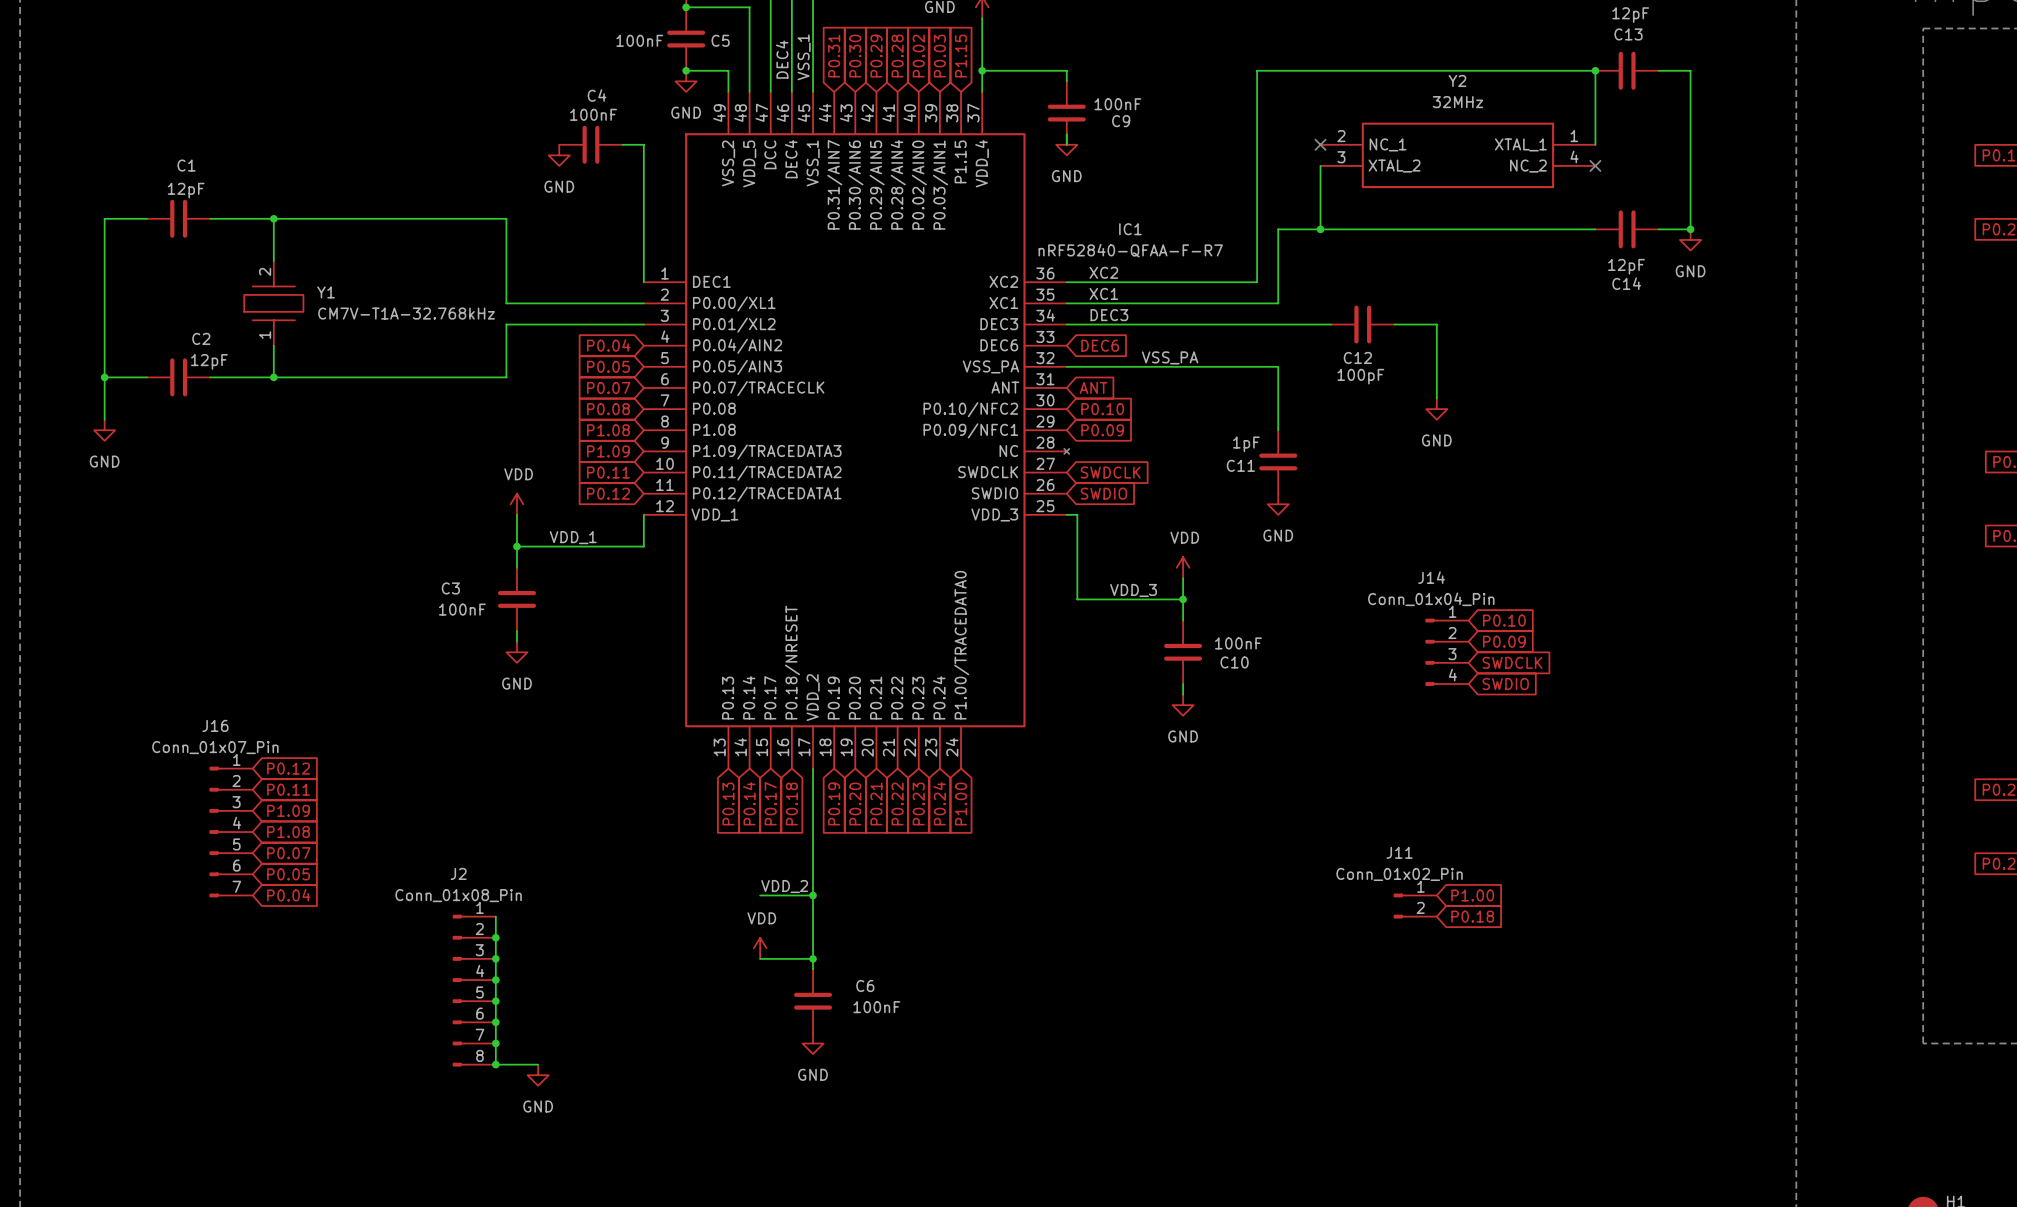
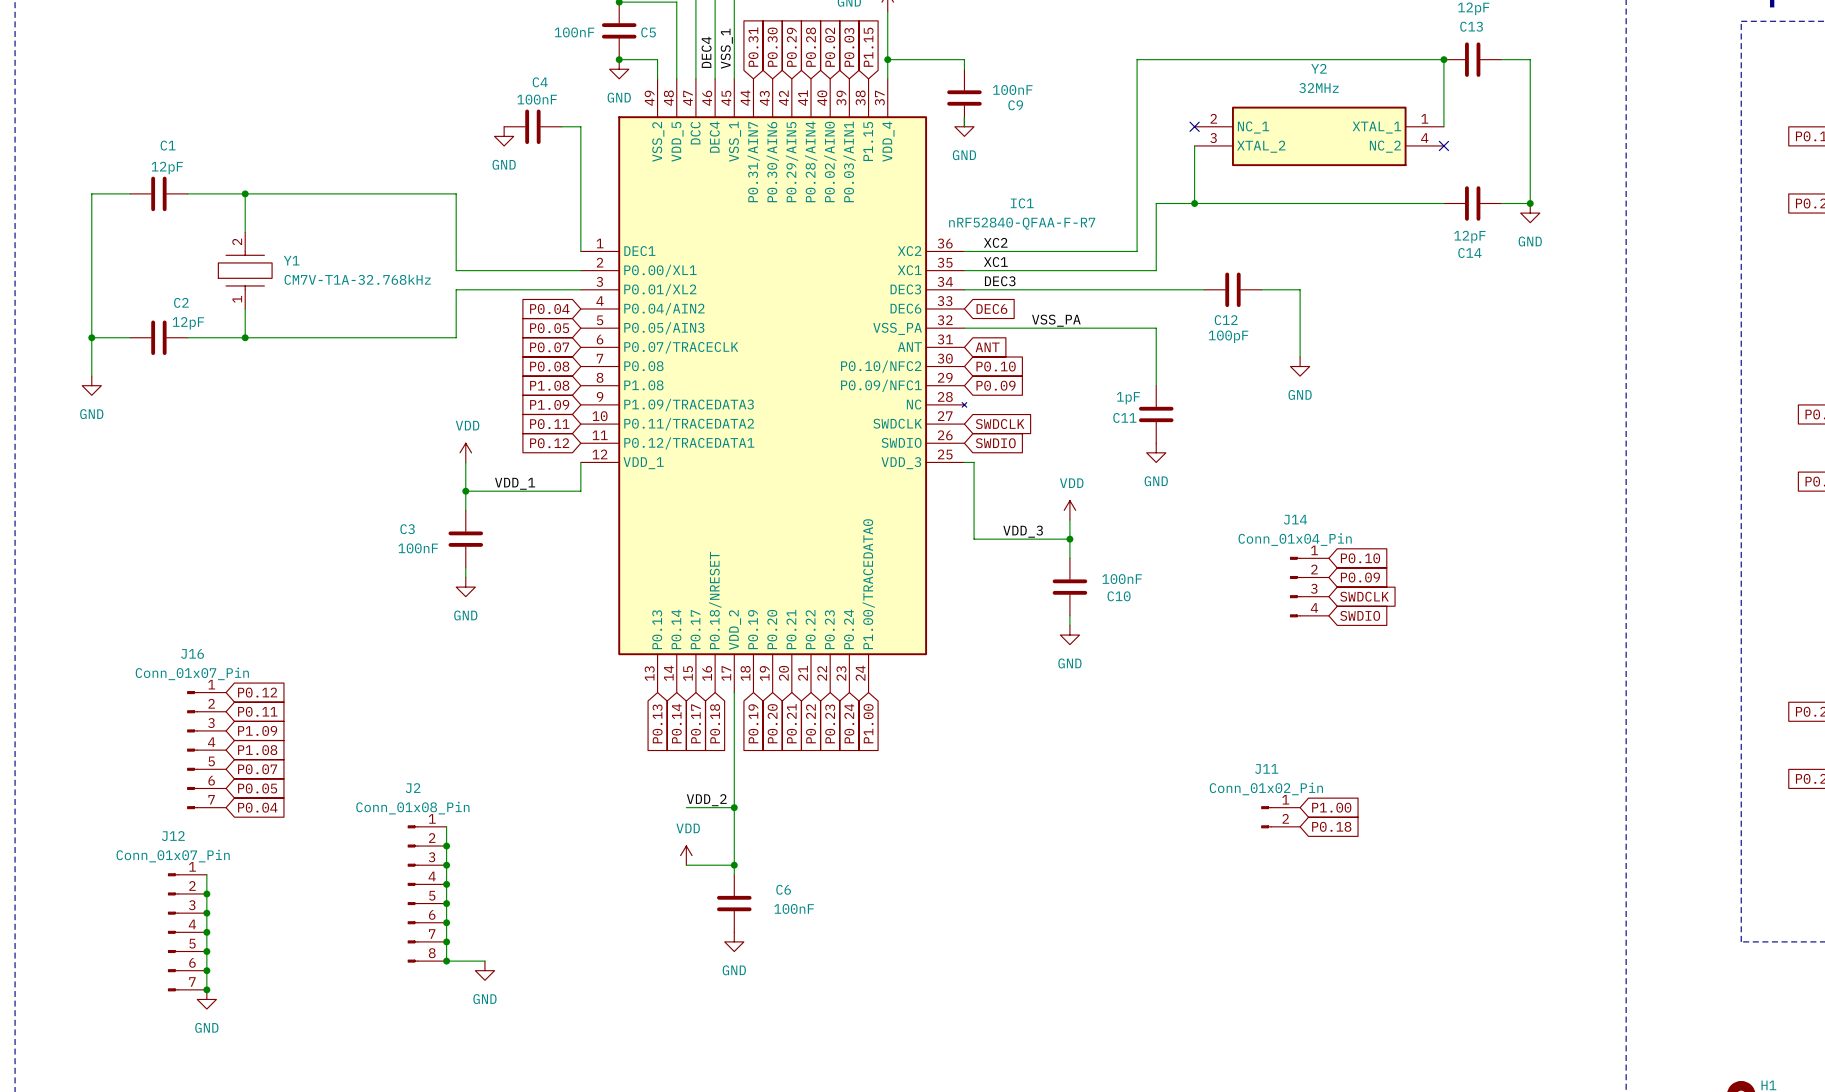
wire: none -> (206, 874) (206, 989)
junction: none -> (206, 893)
junction: none -> (206, 913)
J12: none -> Conn_01x07_Pin (187, 932)
junction: none -> (206, 932)
junction: none -> (206, 951)
junction: none -> (206, 970)
junction: none -> (206, 989)
power symbol: none -> GND (206, 999)

